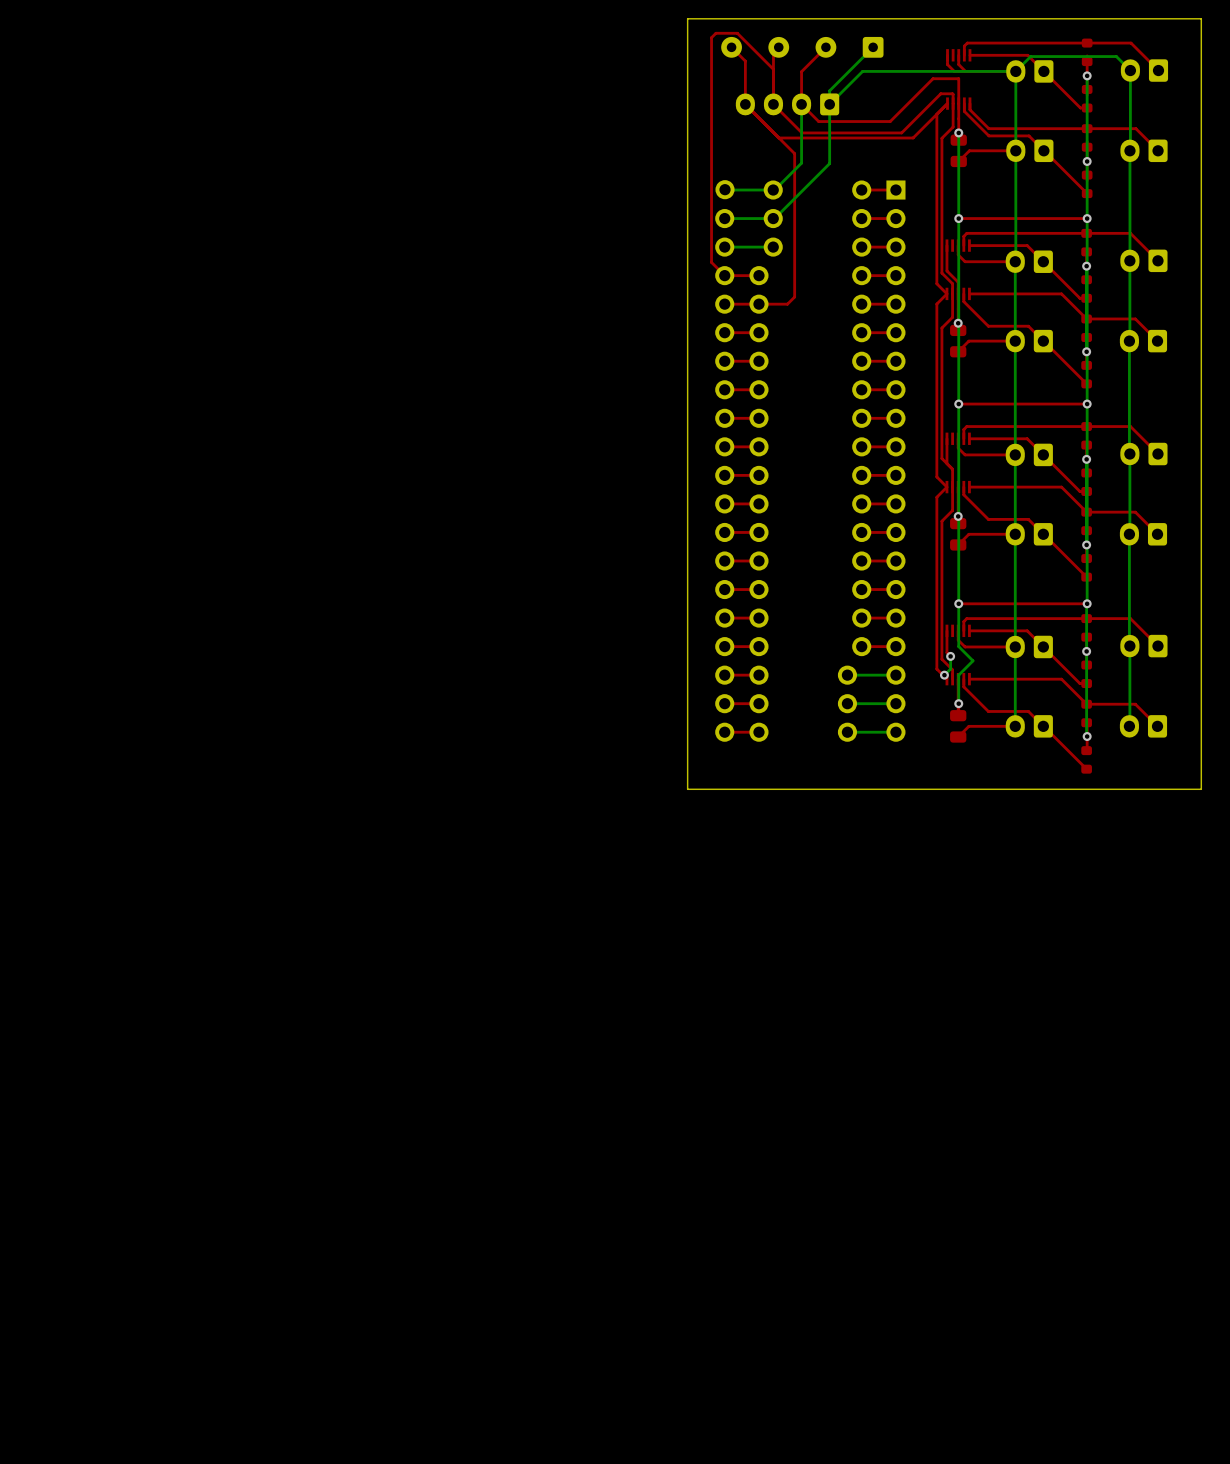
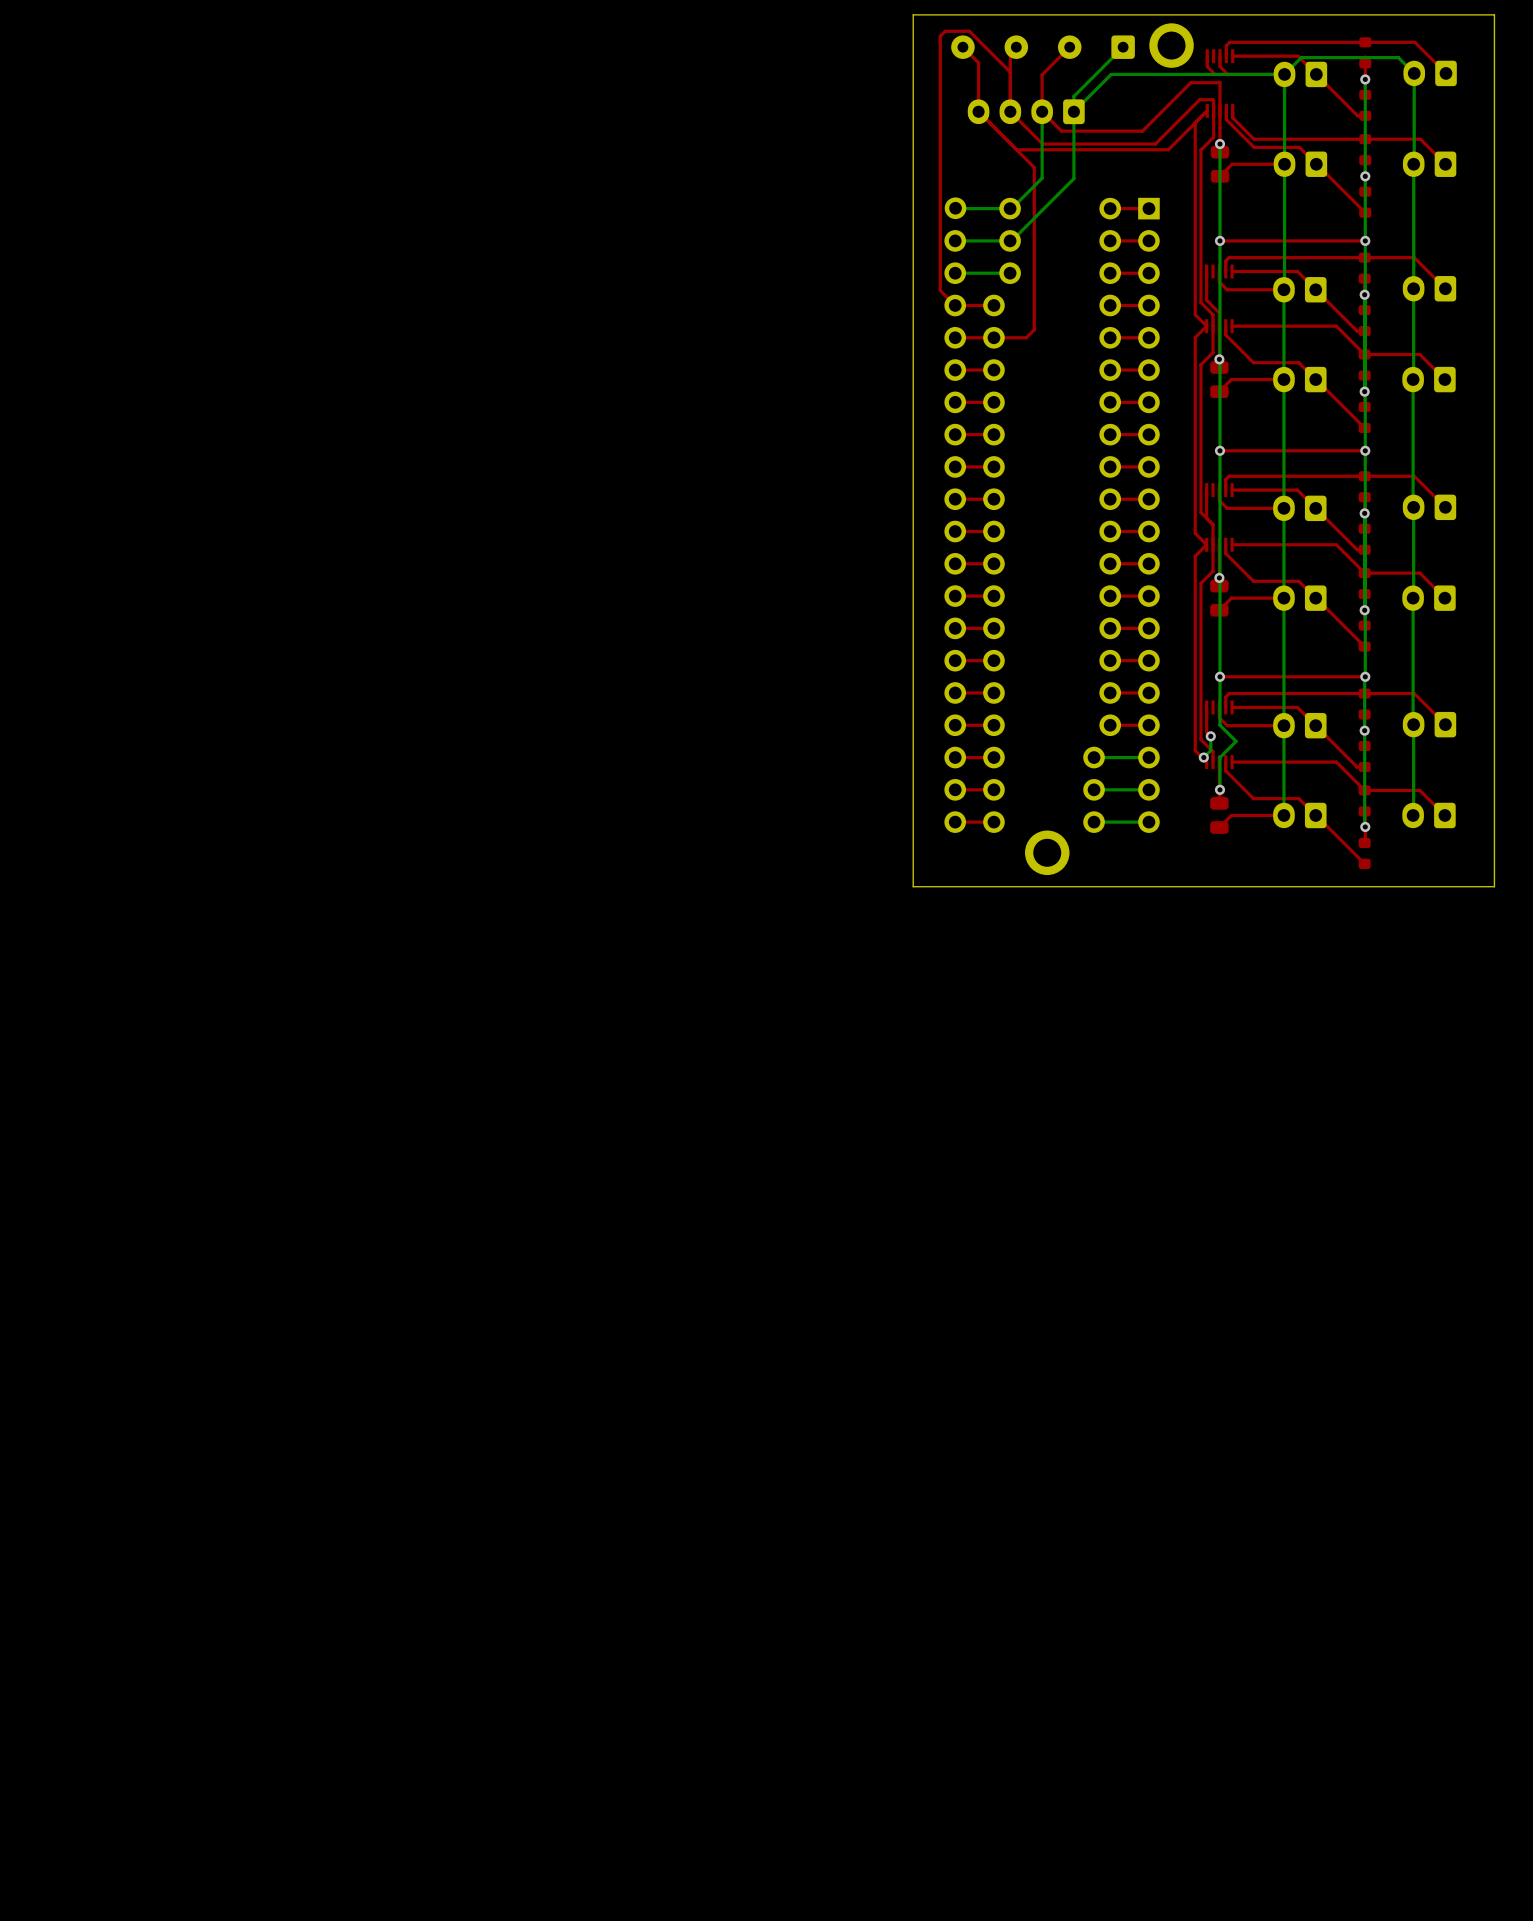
part: none -> (1171, 45)
part: none -> (1047, 852)

